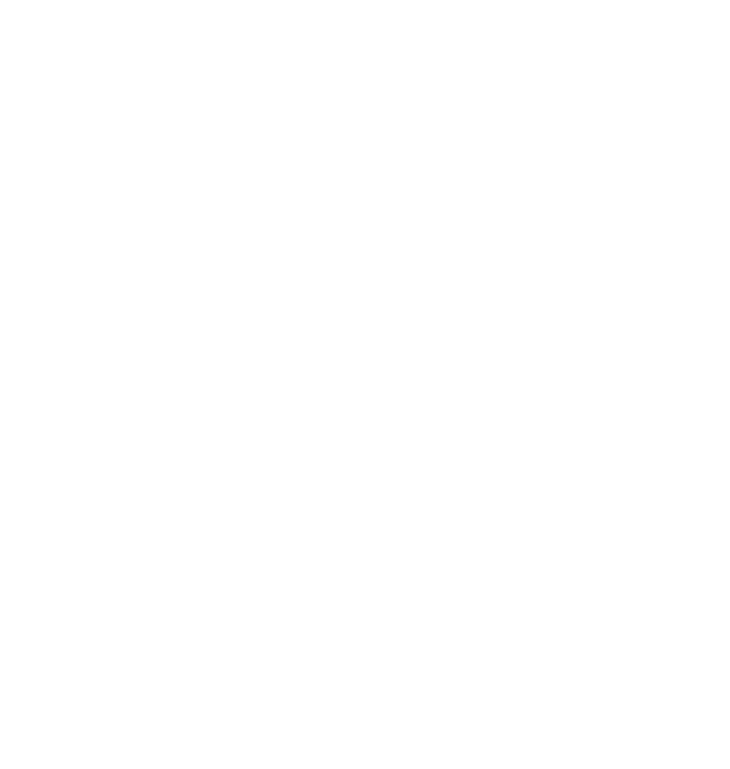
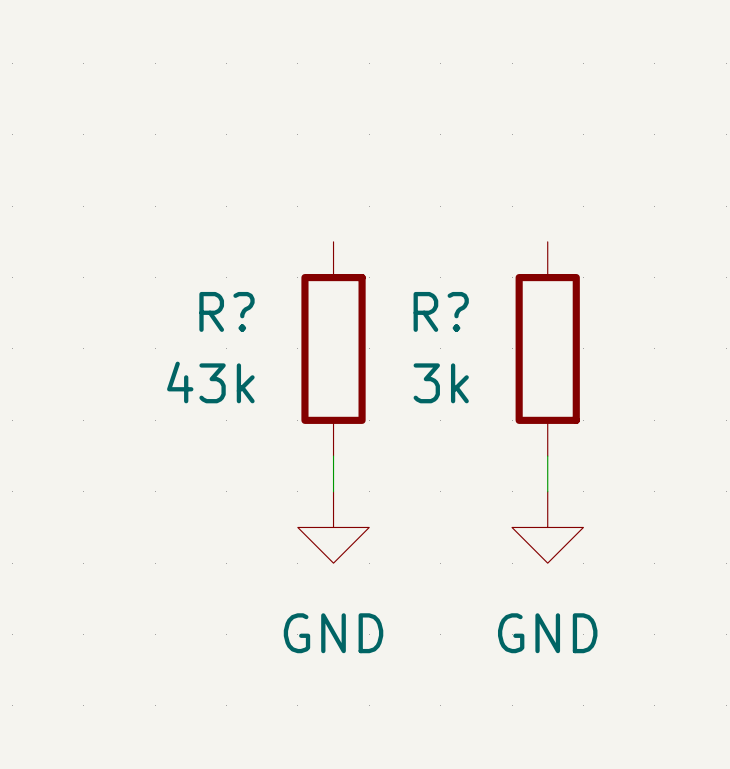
R?: none -> 43k (333, 348)
R?: none -> 3k (547, 348)
wire: none -> (333, 456) (333, 491)
wire: none -> (547, 456) (547, 491)
power symbol: none -> GND (333, 527)
power symbol: none -> GND (547, 527)

